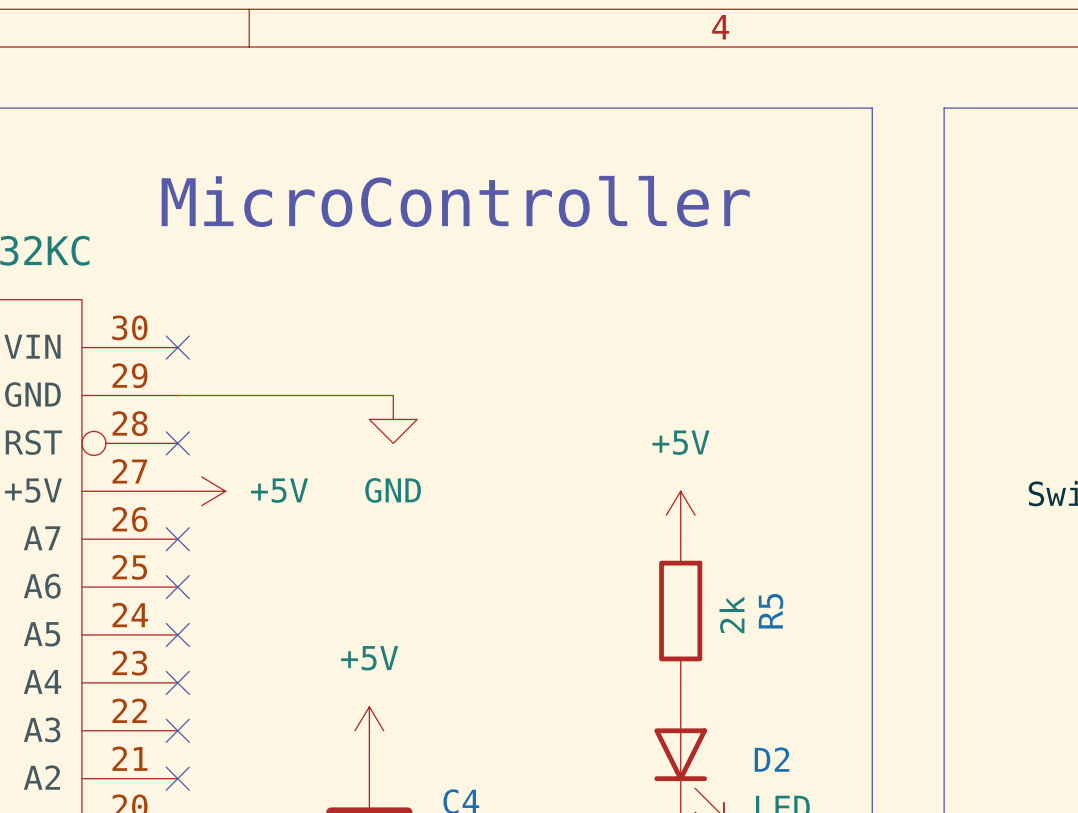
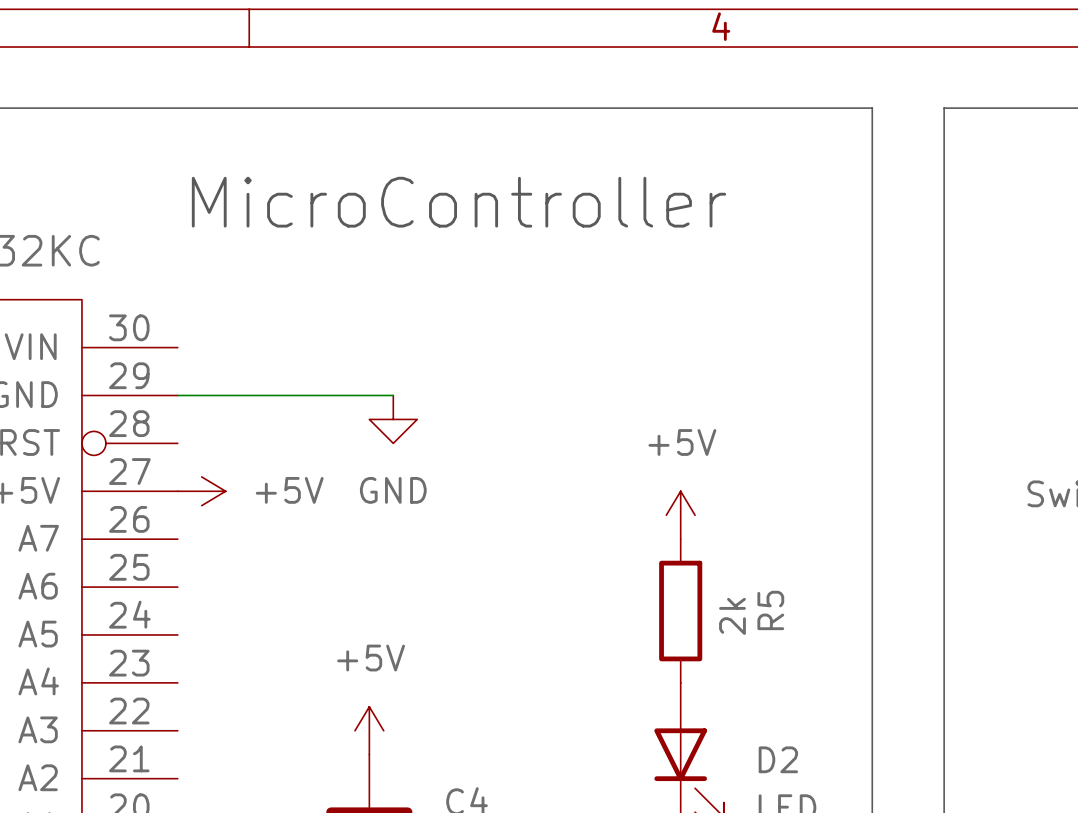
no-connect mark: (177, 347) -> none
no-connect mark: (177, 443) -> none
no-connect mark: (177, 539) -> none
no-connect mark: (177, 587) -> none
no-connect mark: (177, 634) -> none
no-connect mark: (177, 682) -> none
no-connect mark: (177, 730) -> none
no-connect mark: (177, 778) -> none

